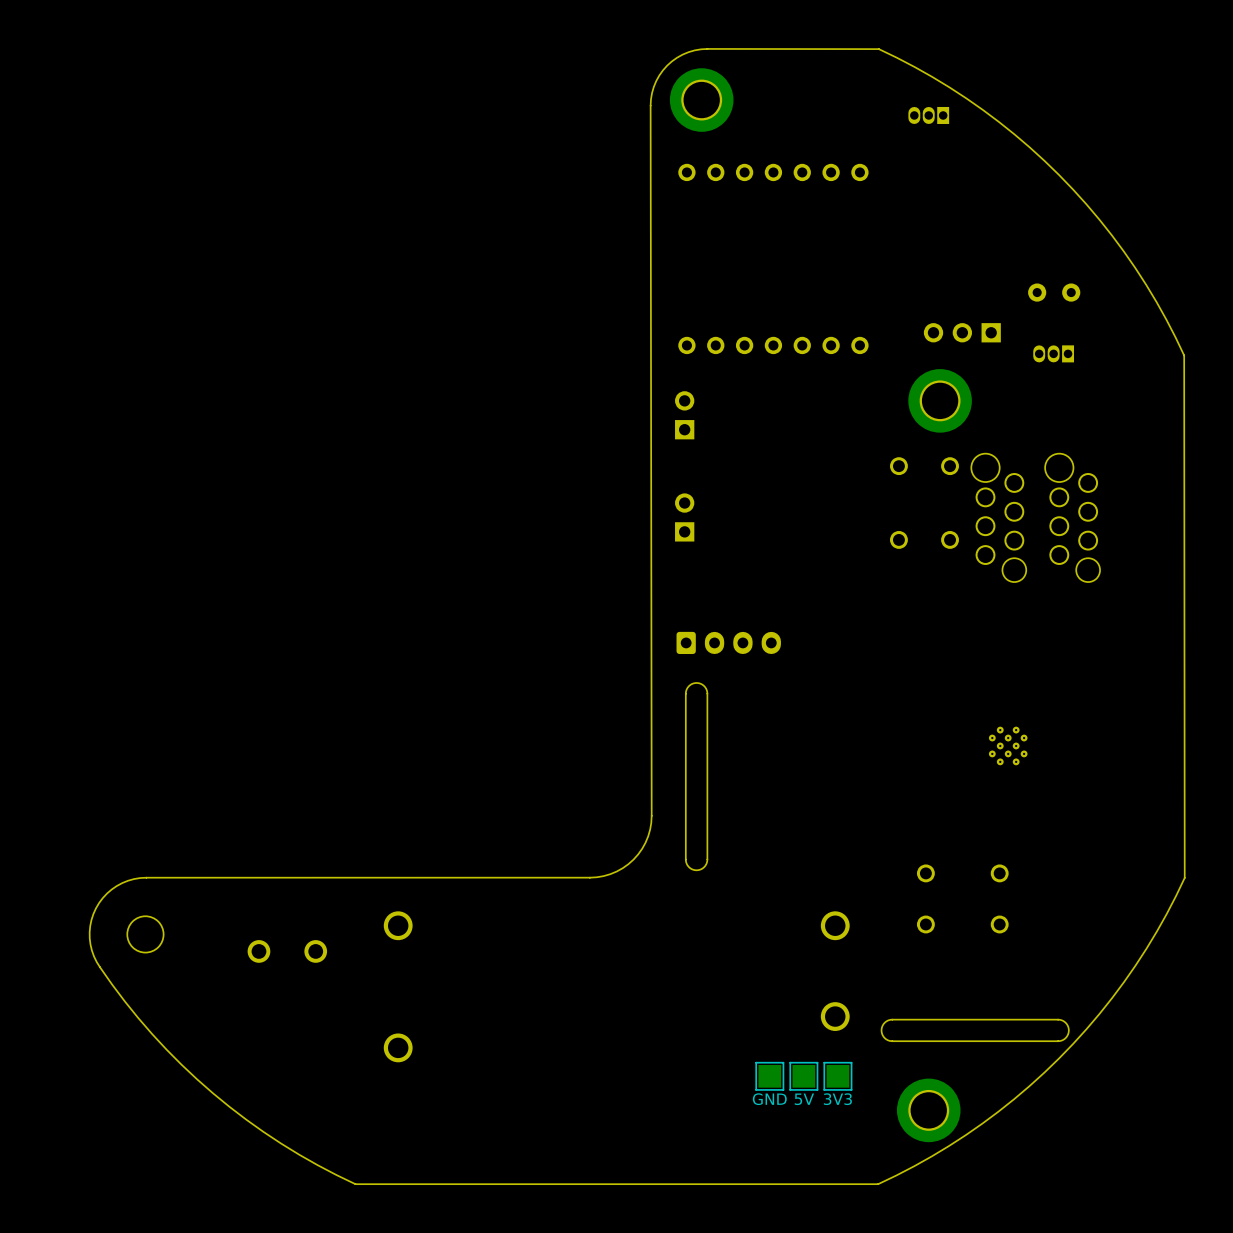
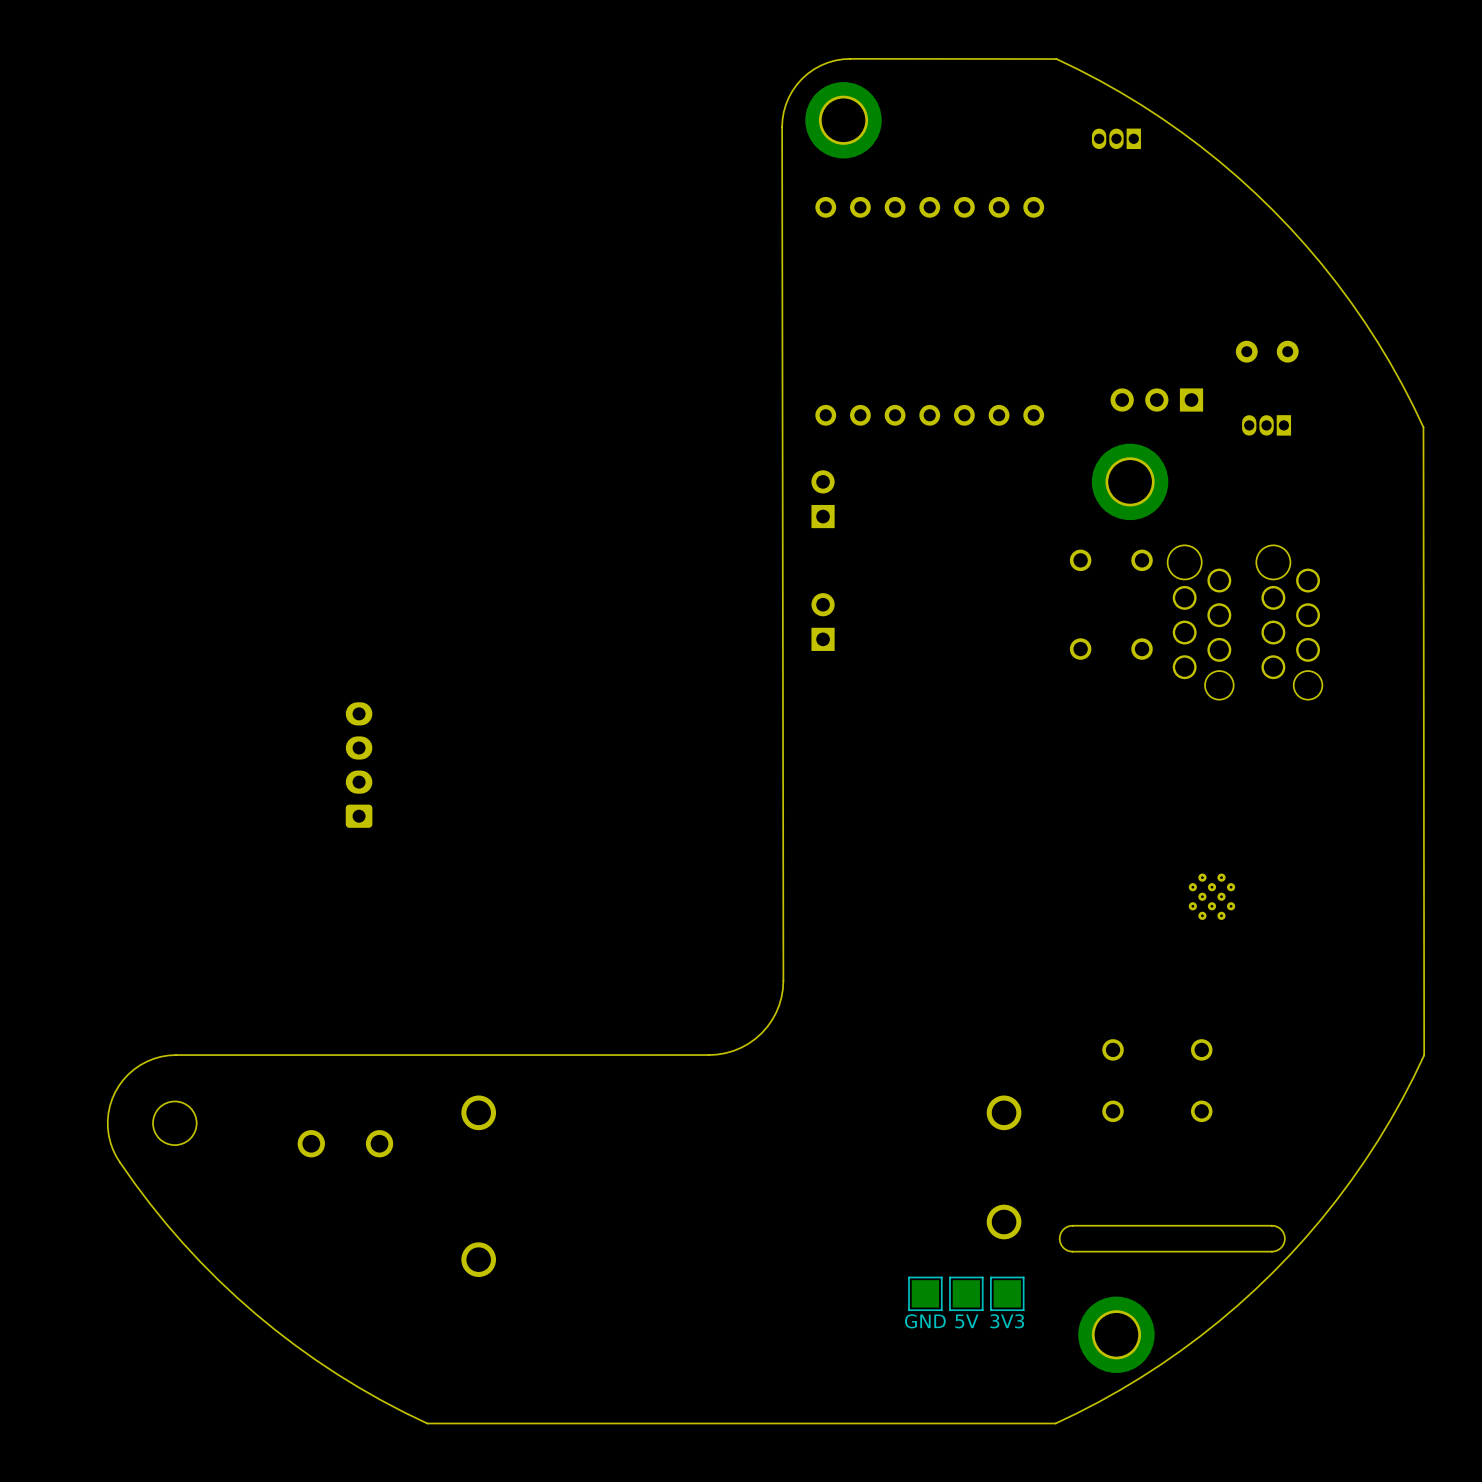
part: none -> (359, 765)
part: (728, 642) -> none
part: (696, 776) -> none

